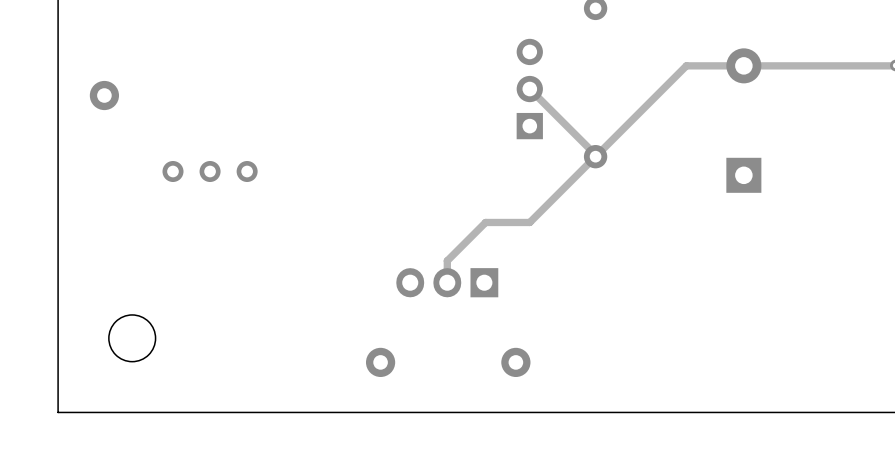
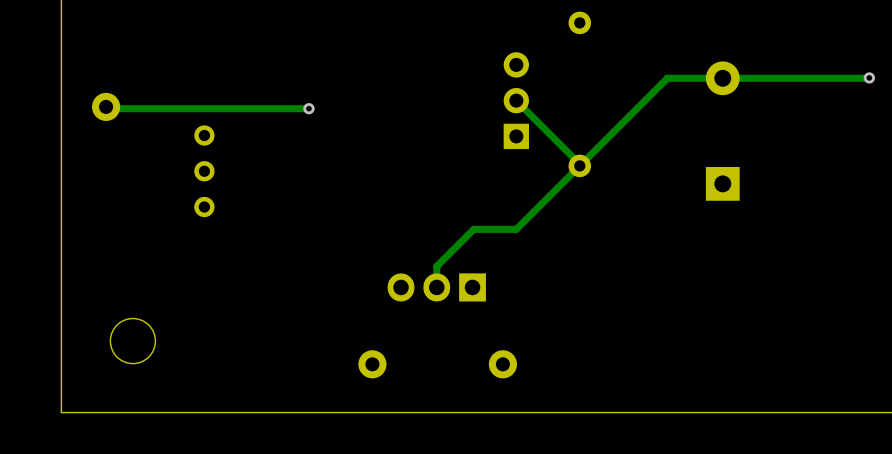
track: none -> (106, 108) (308, 108)
via: none -> (308, 108)
part rotation: 0° (210, 171) -> 90° clockwise (204, 171)

